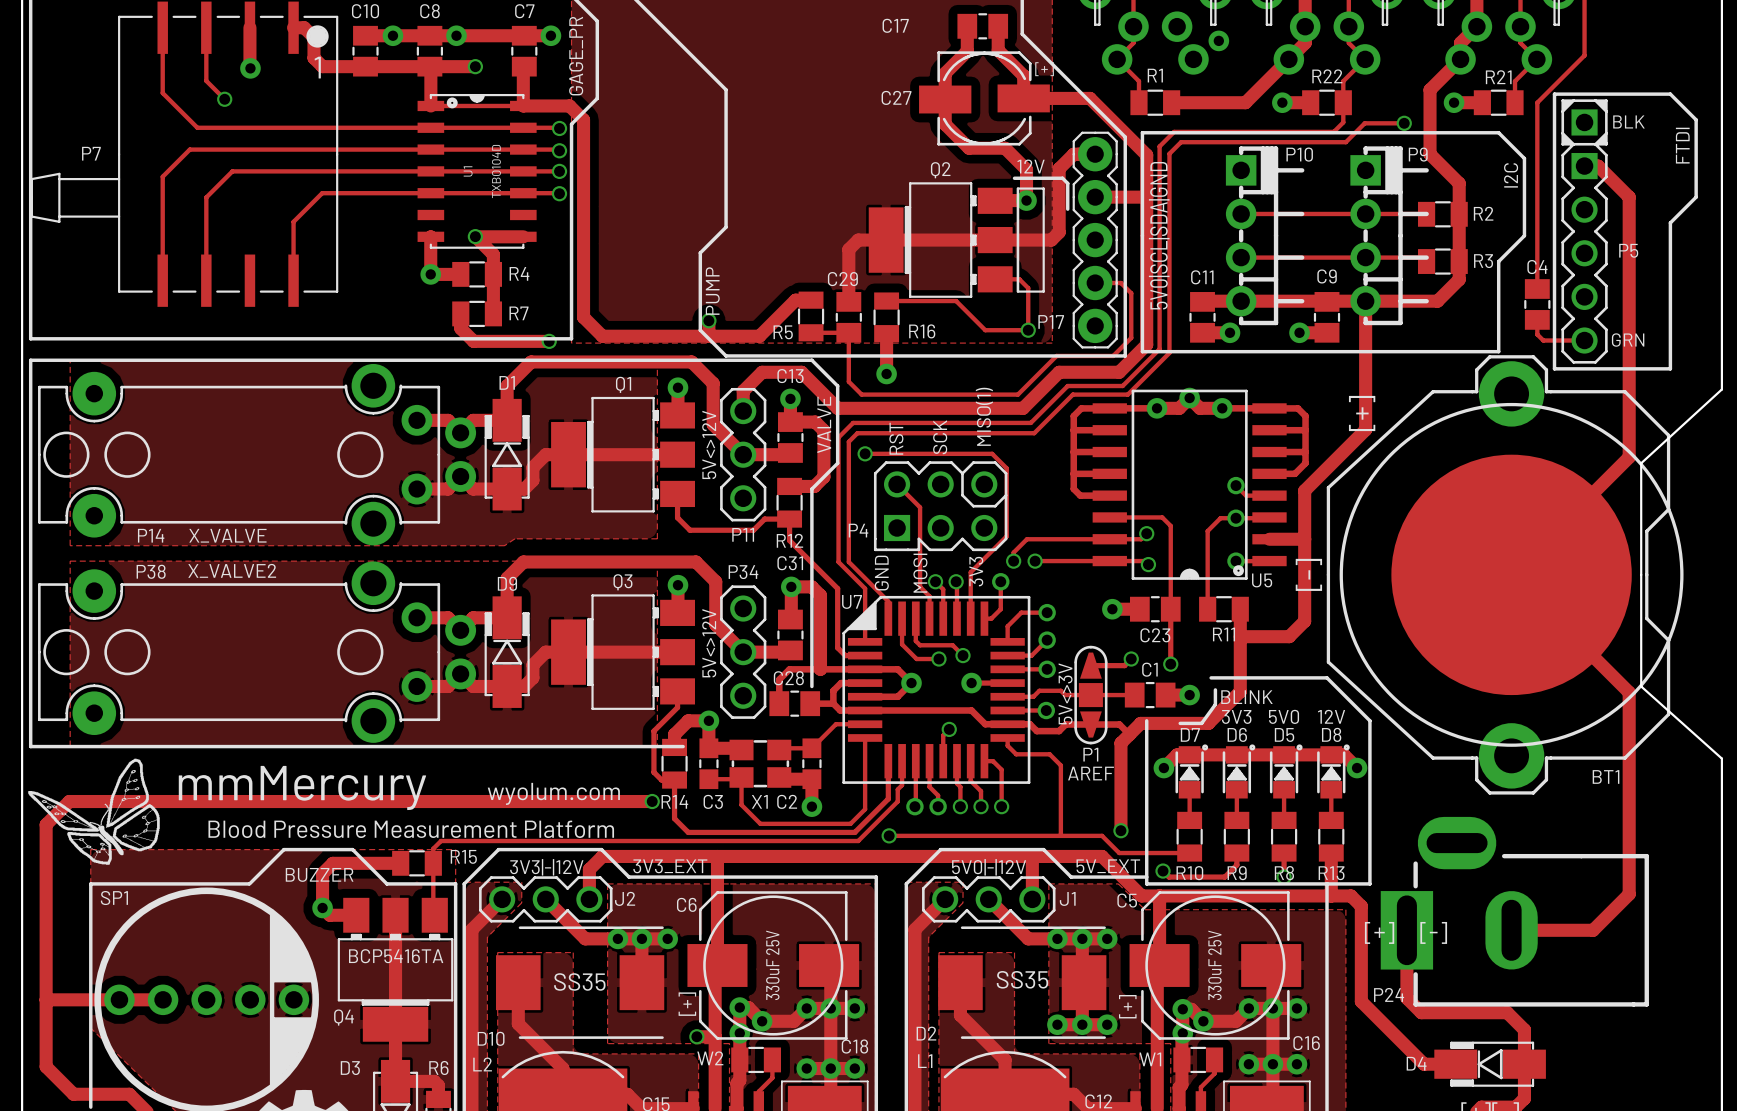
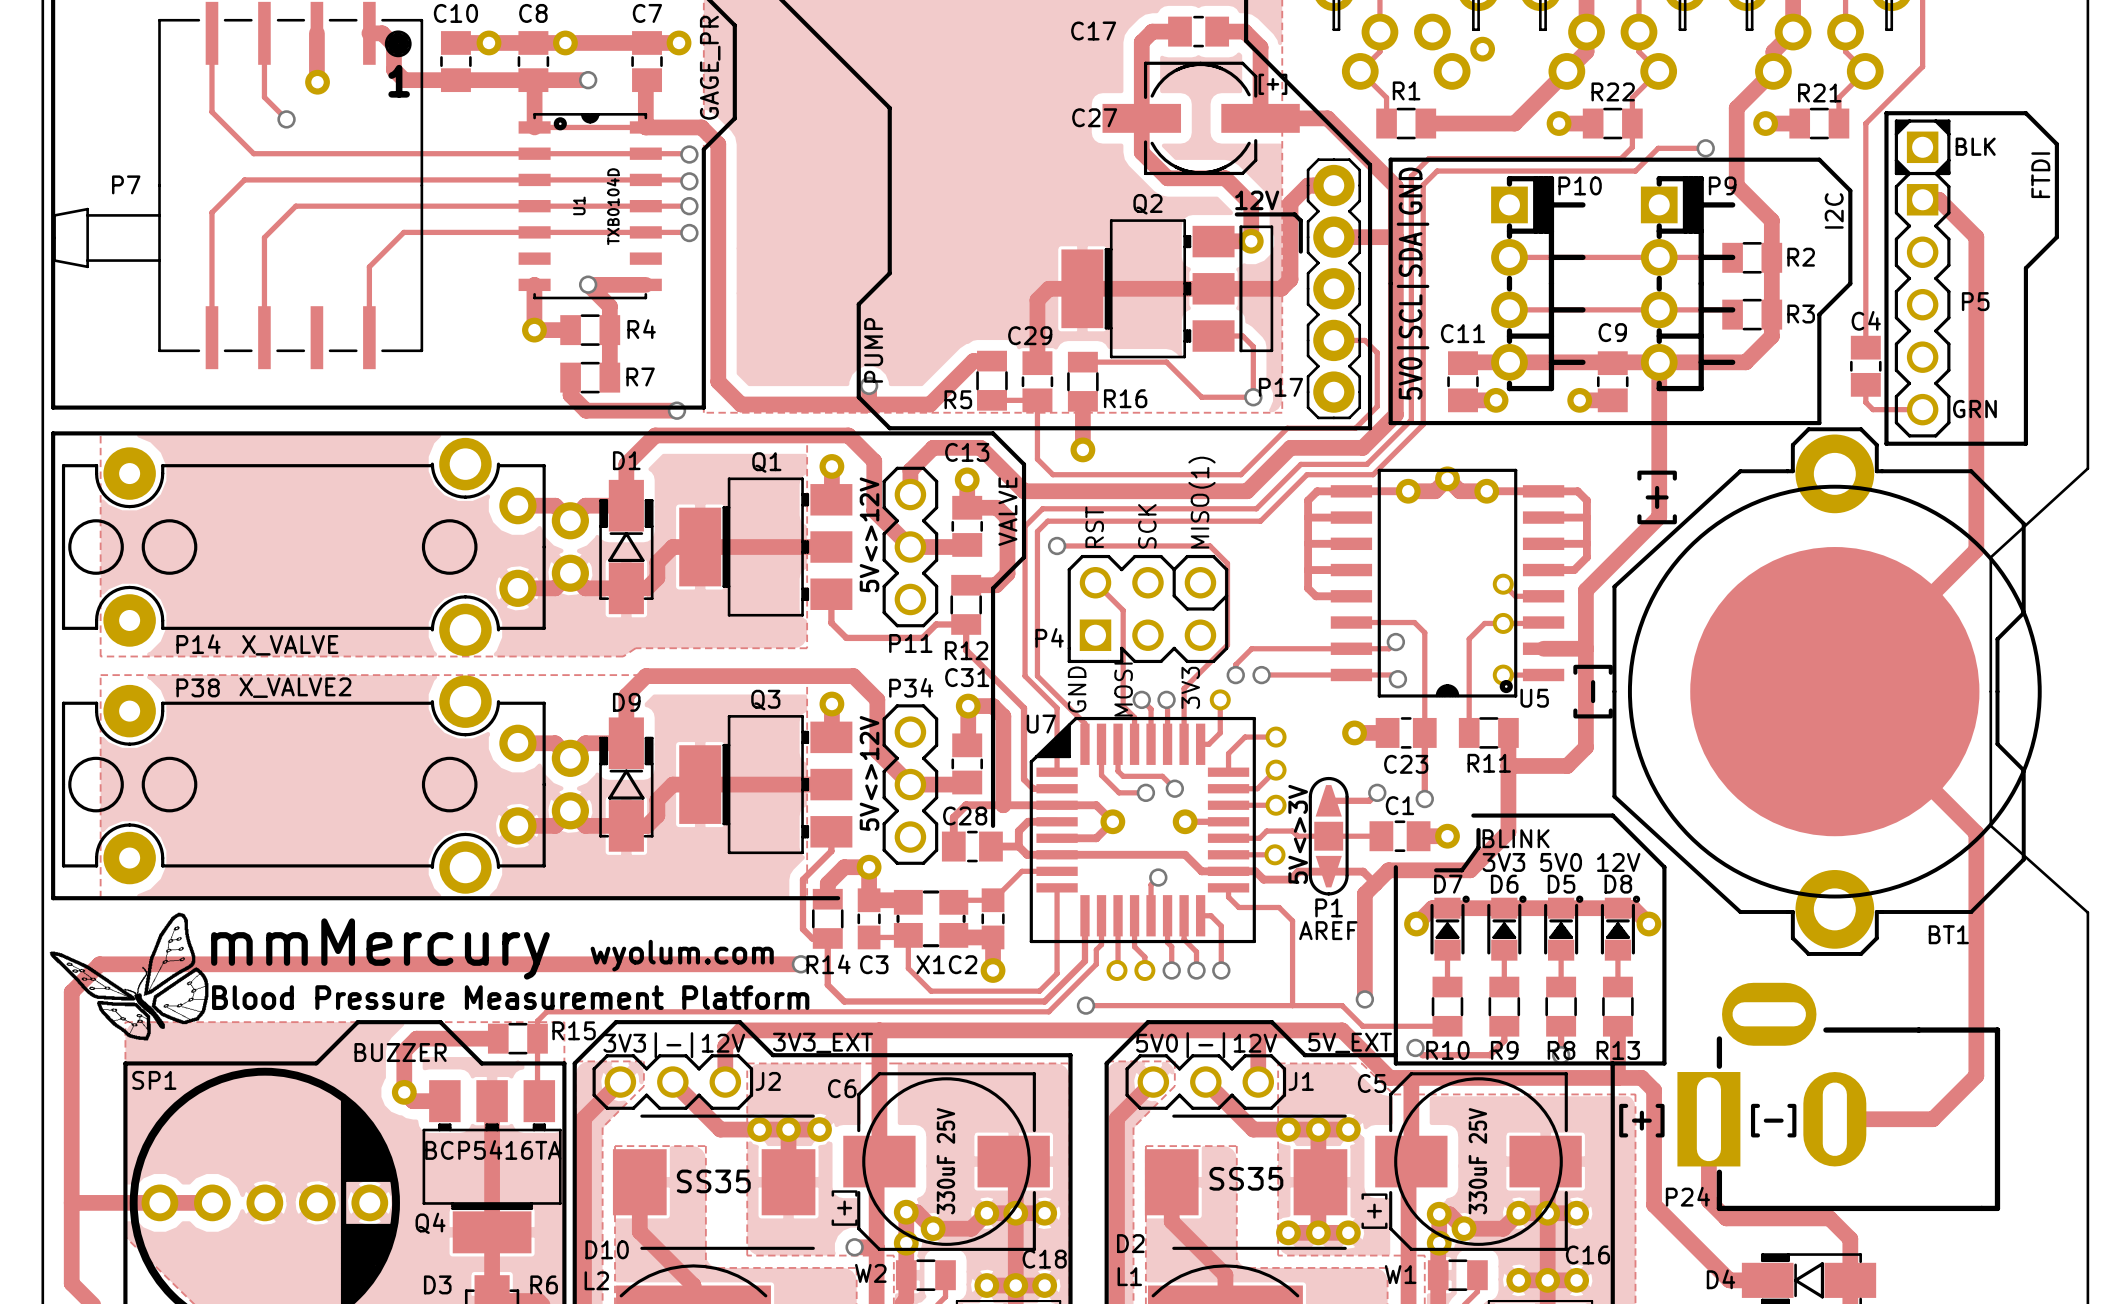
track: (967, 26) (967, 51) (945, 73) (945, 124) (969, 148) -> (1179, 31) (1152, 31) (1141, 42) (1141, 152) (1167, 178) (1182, 178)
track: (998, 26) (998, 50) (1023, 75) (1023, 98) (1034, 98) -> (1217, 31) (1244, 31) (1260, 47) (1260, 118)
C27 footprint: [919, 51, 1050, 146] -> [1102, 61, 1300, 176]

